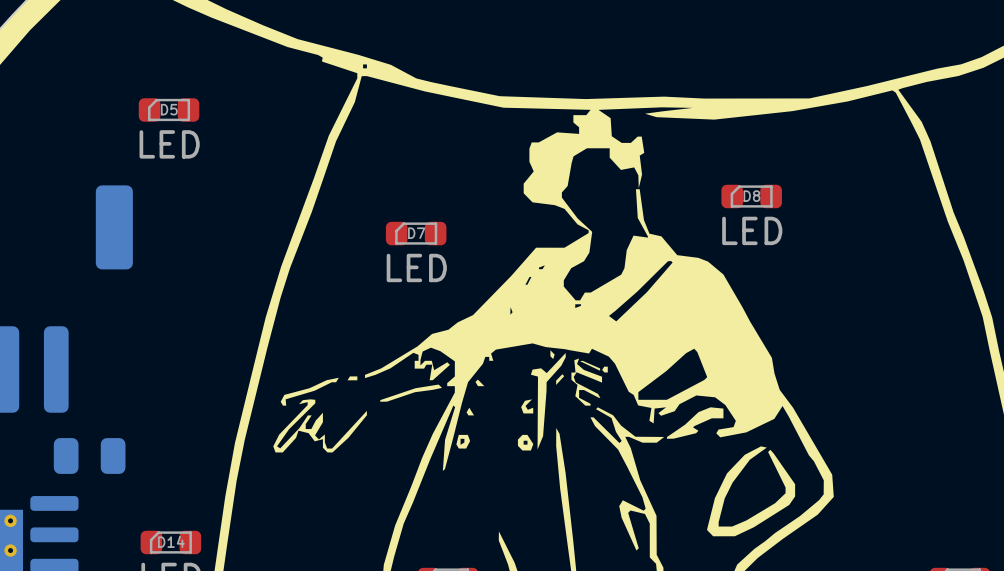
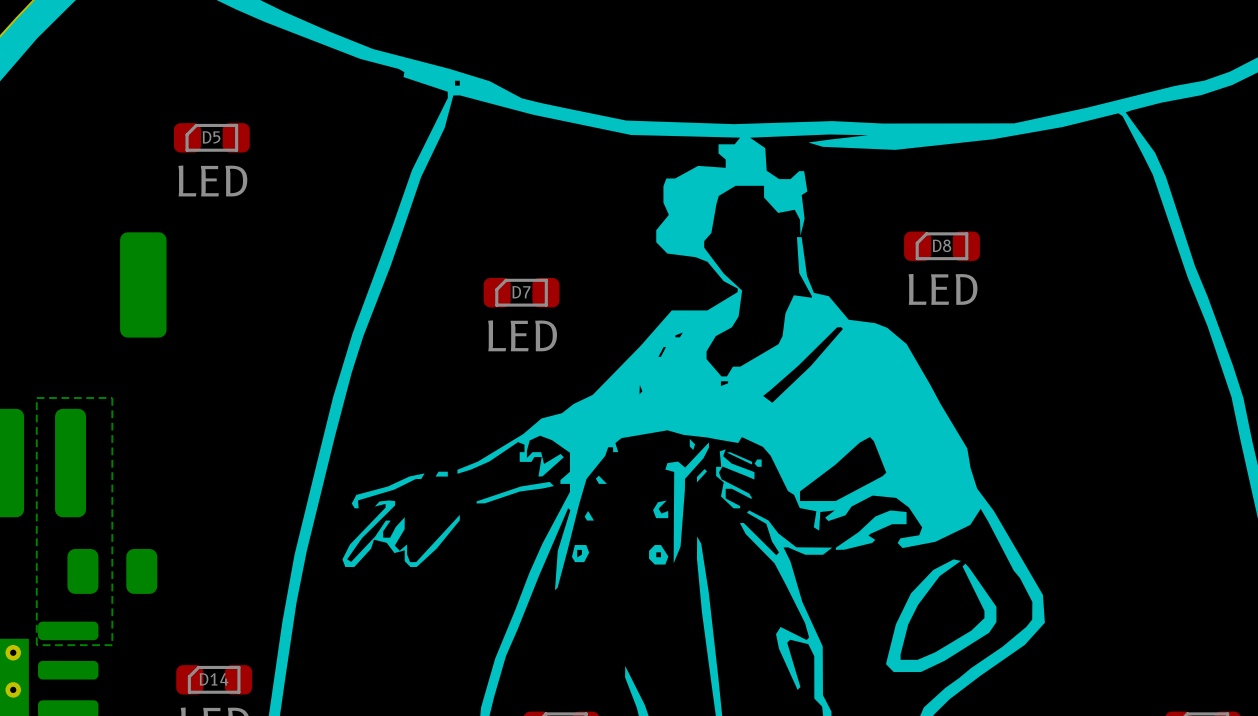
bottom zone outline: none -> (36, 398) (36, 645) (112, 645) (112, 398) (36, 398)

